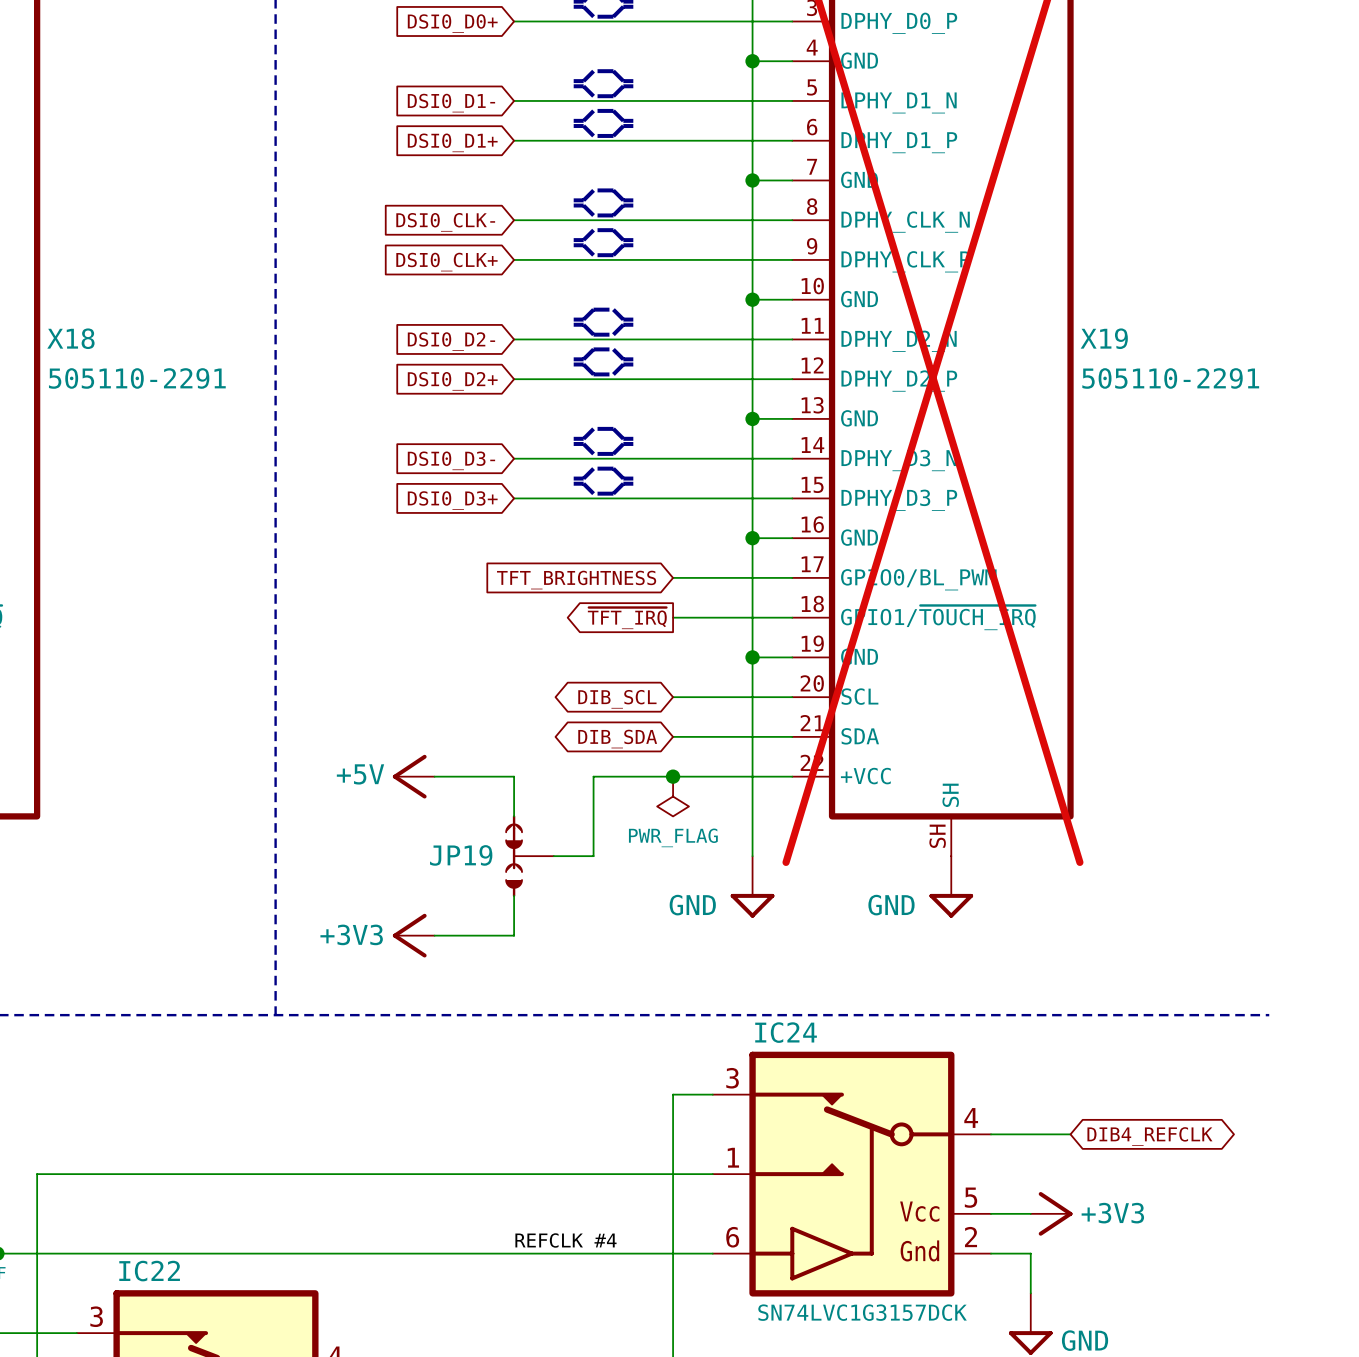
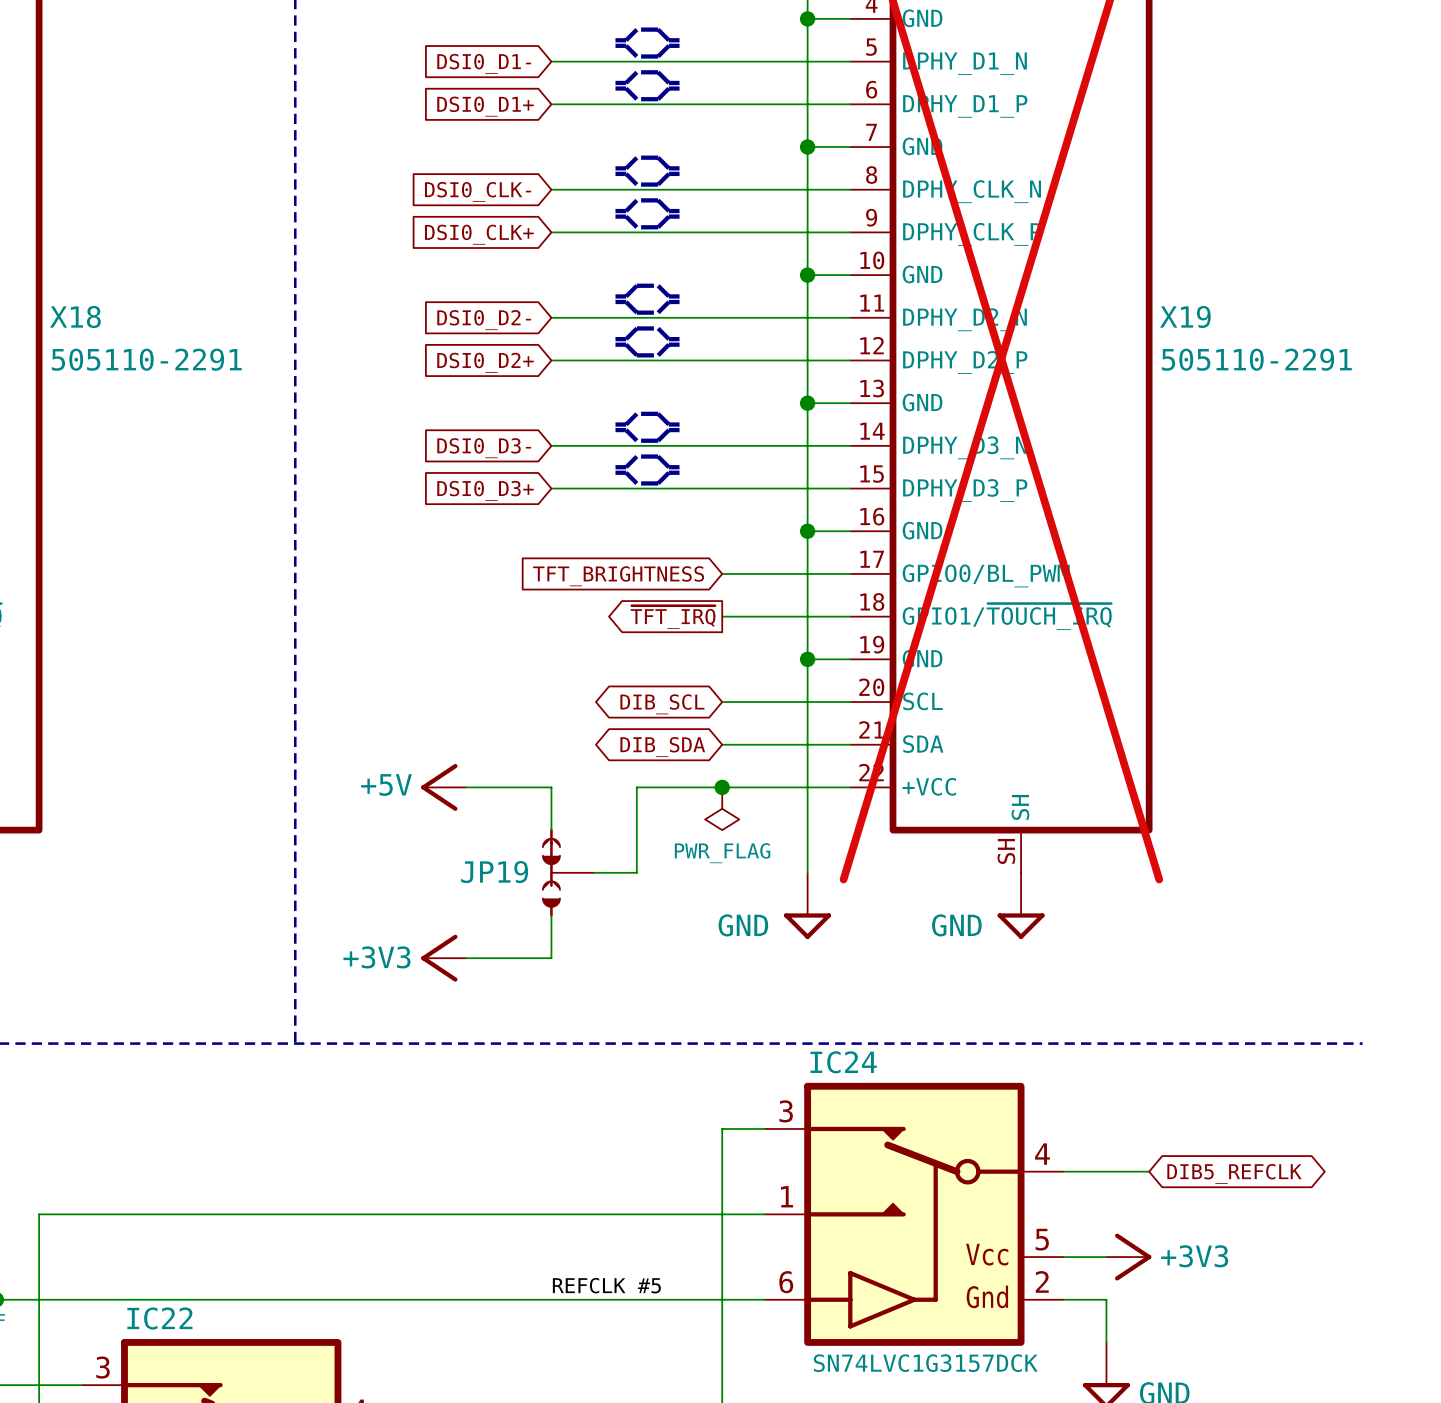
global label: DIB4_REFCLK (1149, 1136) -> DIB5_REFCLK (1234, 1173)
label: REFCLK #4 (565, 1240) -> REFCLK #5 (606, 1285)

